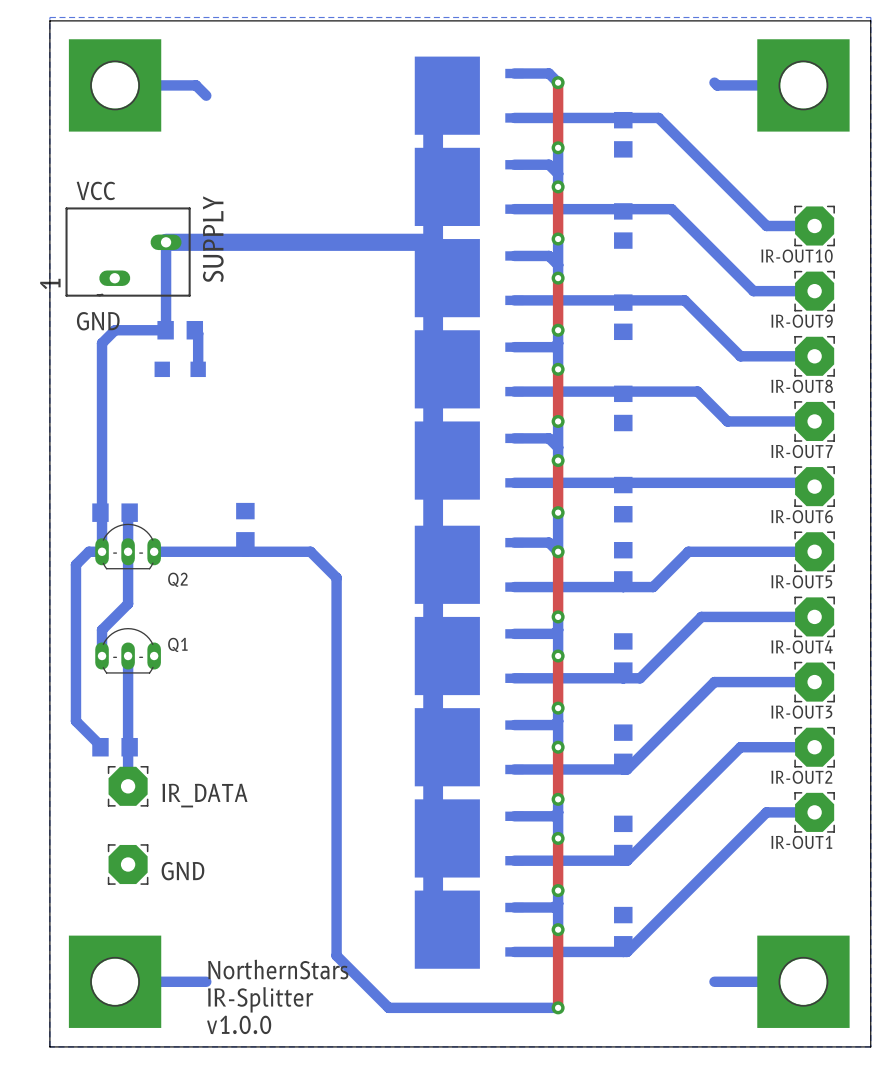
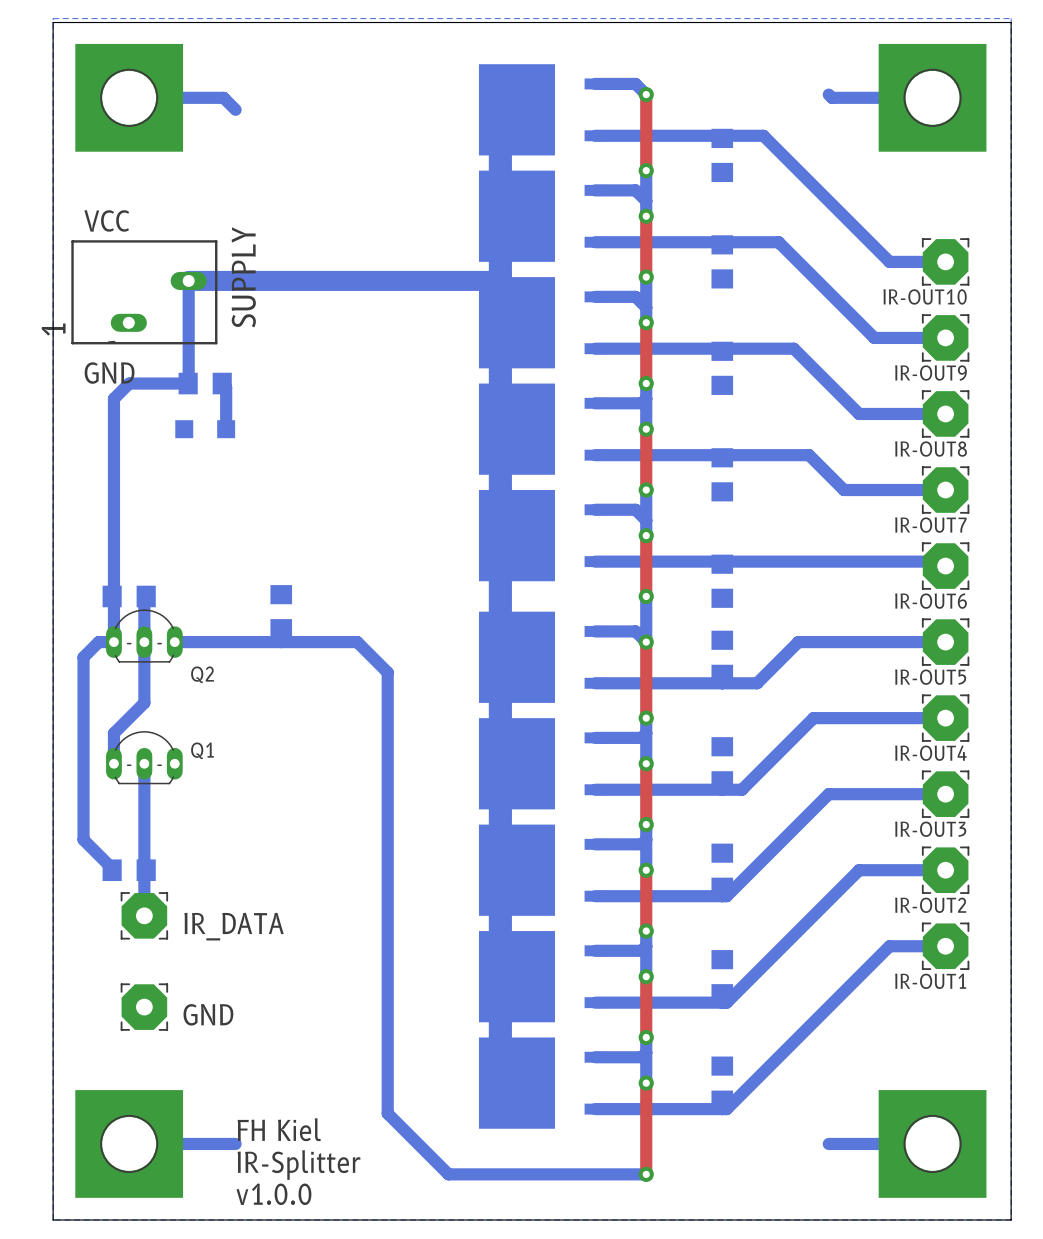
text: NorthernStars (278, 969) -> FH Kiel (279, 1129)

